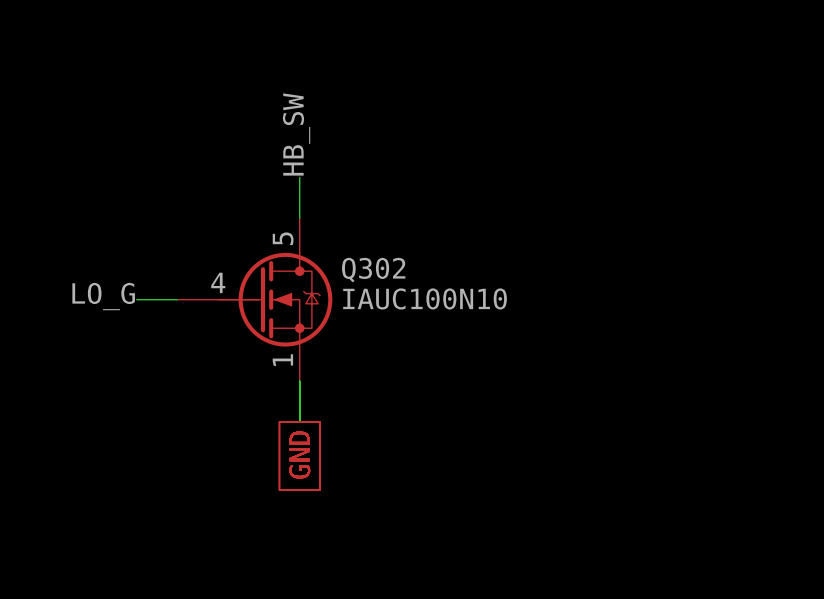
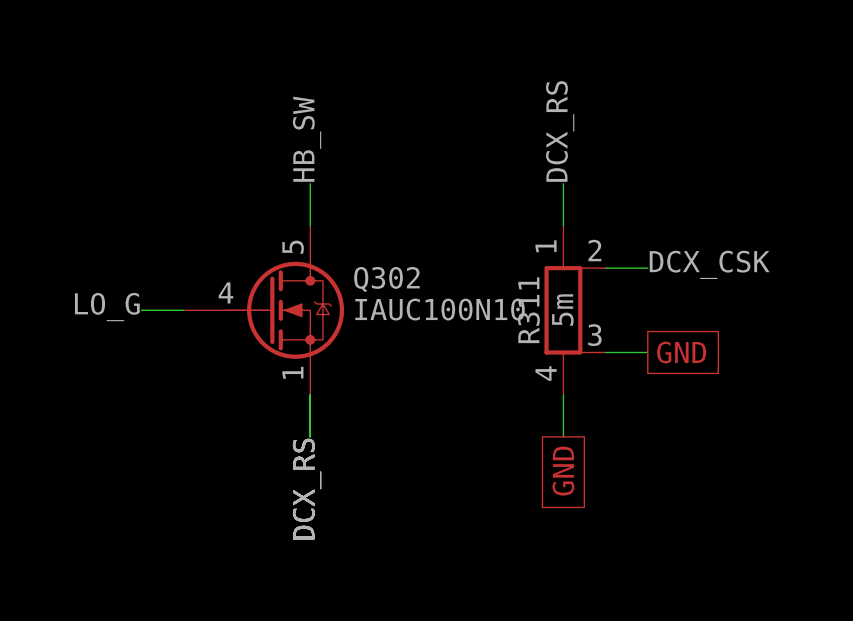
label: none -> DCX_RS (560, 131)
wire: none -> (563, 183) (563, 225)
label: none -> DCX_CSK (709, 264)
wire: none -> (605, 268) (647, 268)
R311: none -> 5m (575, 310)
wire: none -> (605, 352) (647, 352)
global label: none -> GND (681, 352)
wire: none -> (563, 394) (563, 436)
global label: GND (299, 454) -> none
global label: none -> GND (563, 471)
label: none -> DCX_RS (307, 489)

